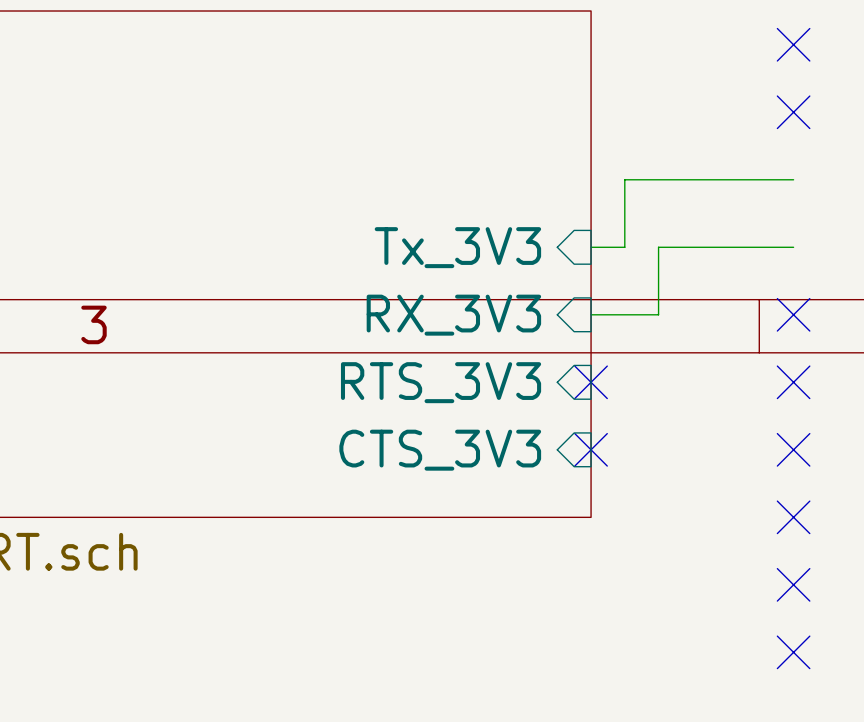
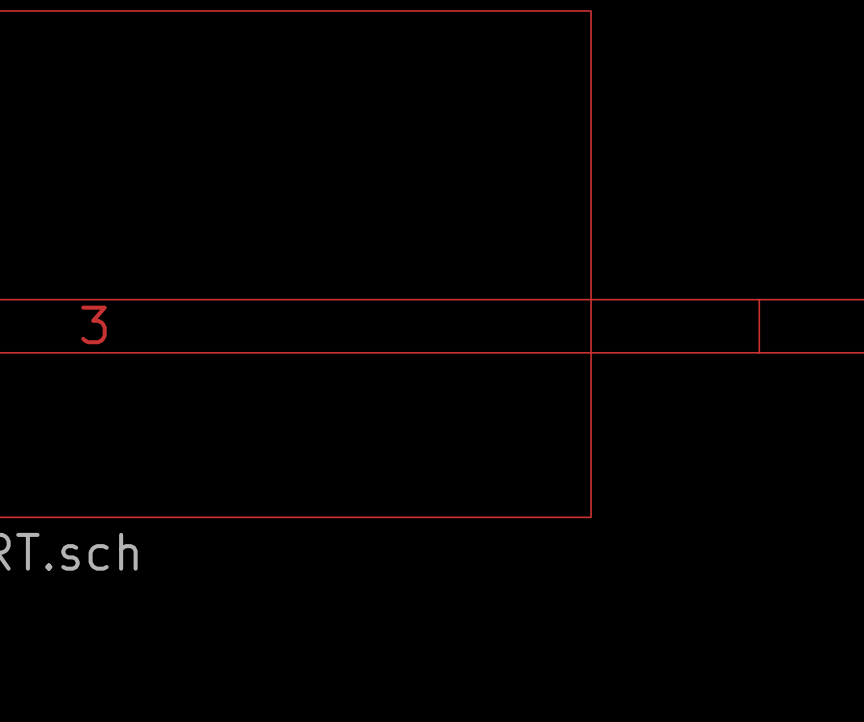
no-connect mark: (793, 44) -> none
no-connect mark: (793, 112) -> none
wire: (793, 179) (624, 179) (624, 247) (591, 247) -> none
sheet pin: Tx_3V3 (457, 247) -> none
wire: (793, 247) (658, 247) (658, 314) (591, 314) -> none
no-connect mark: (793, 314) -> none
sheet pin: RX_3V3 (453, 315) -> none
sheet pin: RTS_3V3 (441, 382) -> none
no-connect mark: (591, 382) -> none
no-connect mark: (793, 382) -> none
no-connect mark: (591, 449) -> none
no-connect mark: (793, 449) -> none
sheet pin: CTS_3V3 (440, 450) -> none
no-connect mark: (793, 517) -> none
no-connect mark: (793, 584) -> none
no-connect mark: (793, 652) -> none

